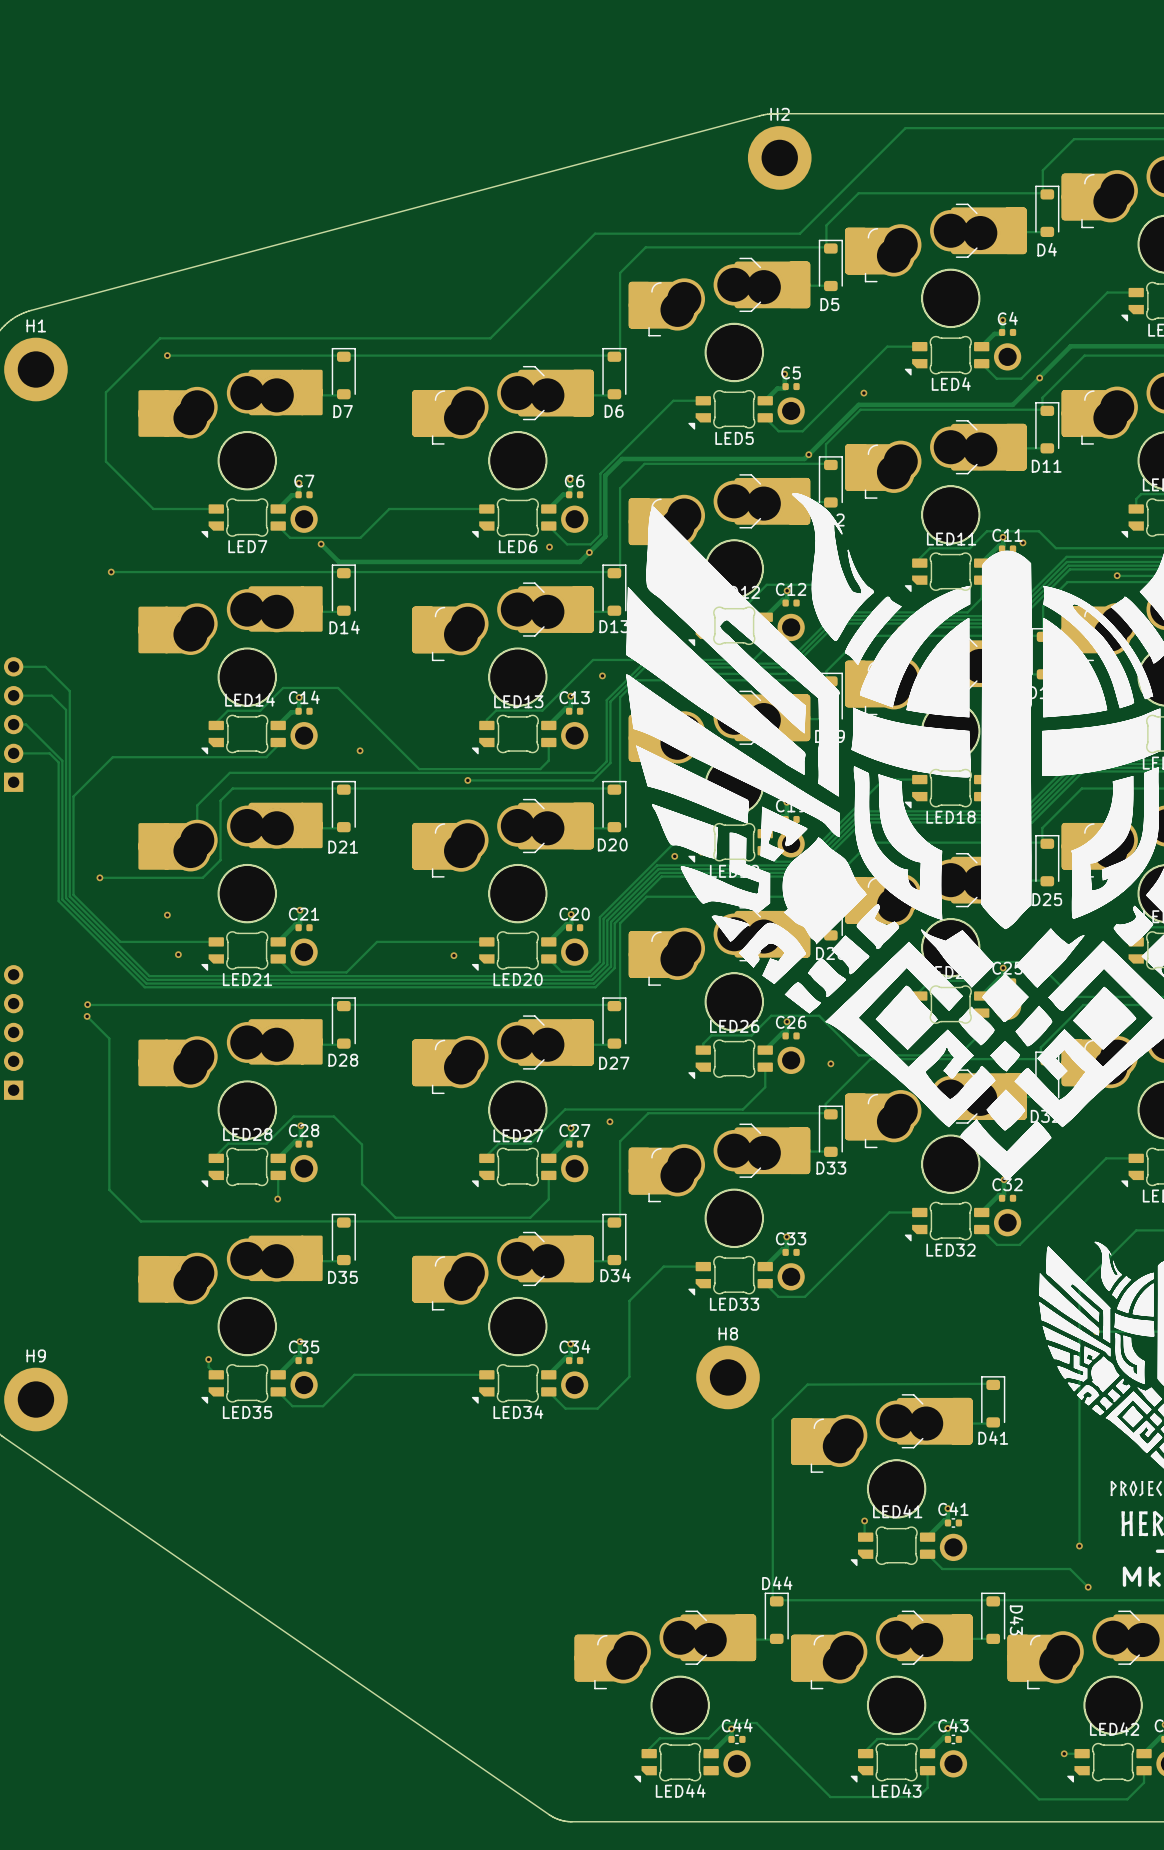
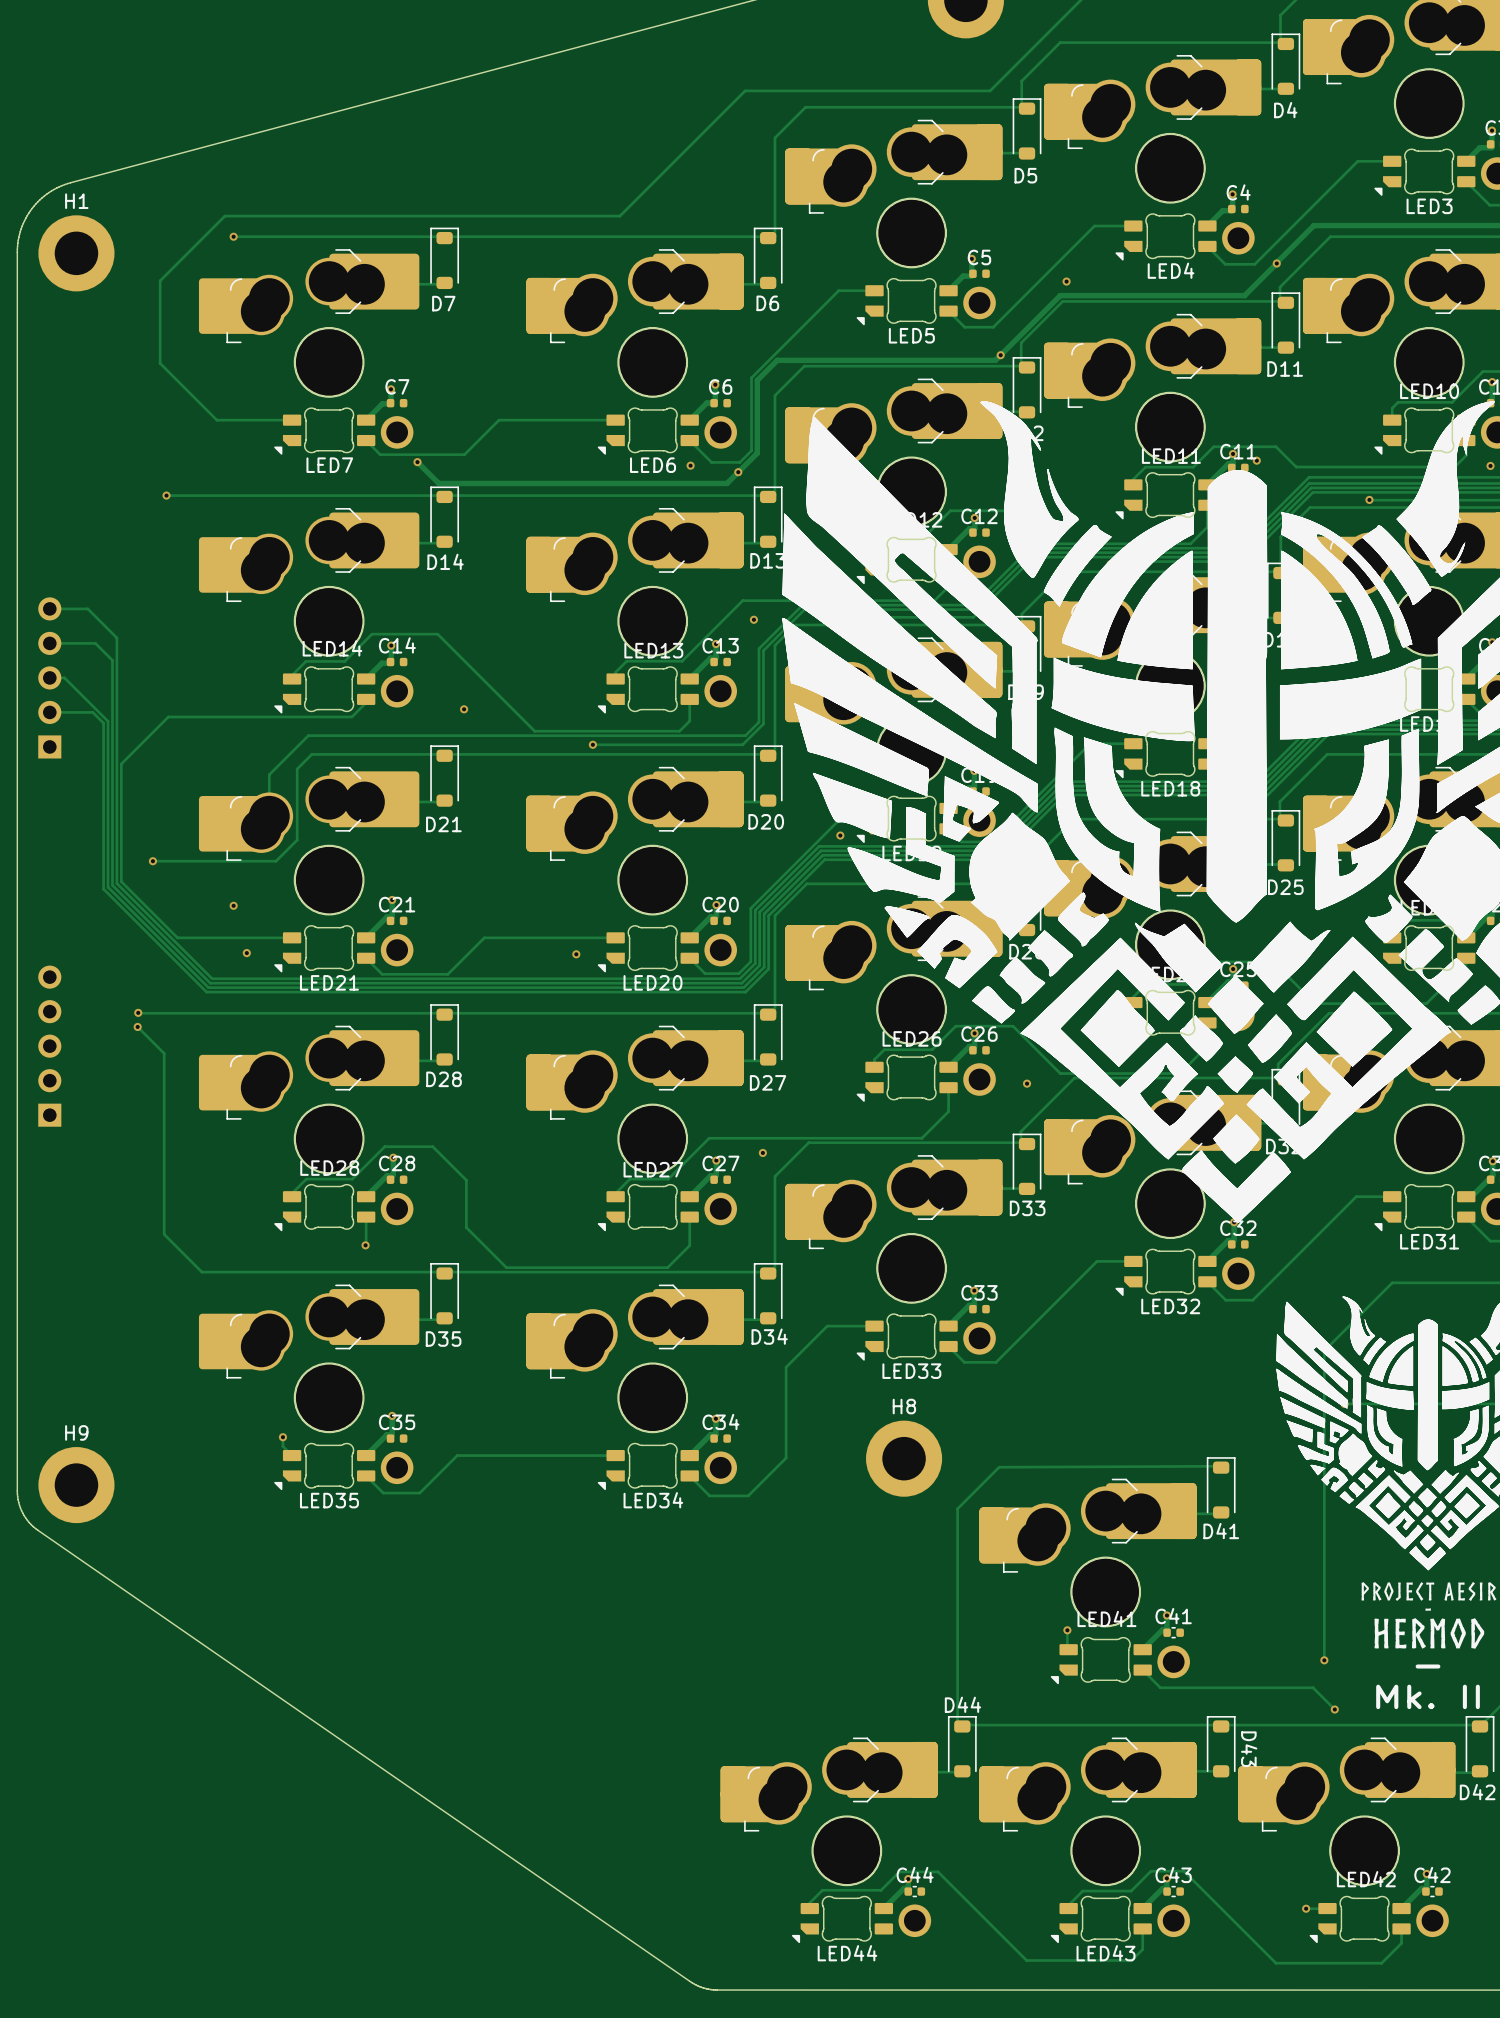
part footprint: [138, 369, 323, 533] -> [198, 249, 420, 449]
part footprint: [138, 586, 323, 750] -> [198, 508, 420, 708]
part footprint: [138, 802, 323, 966] -> [198, 766, 420, 967]
part footprint: [138, 1019, 323, 1183] -> [198, 1025, 420, 1226]
part footprint: [138, 1235, 323, 1399] -> [198, 1284, 420, 1485]

